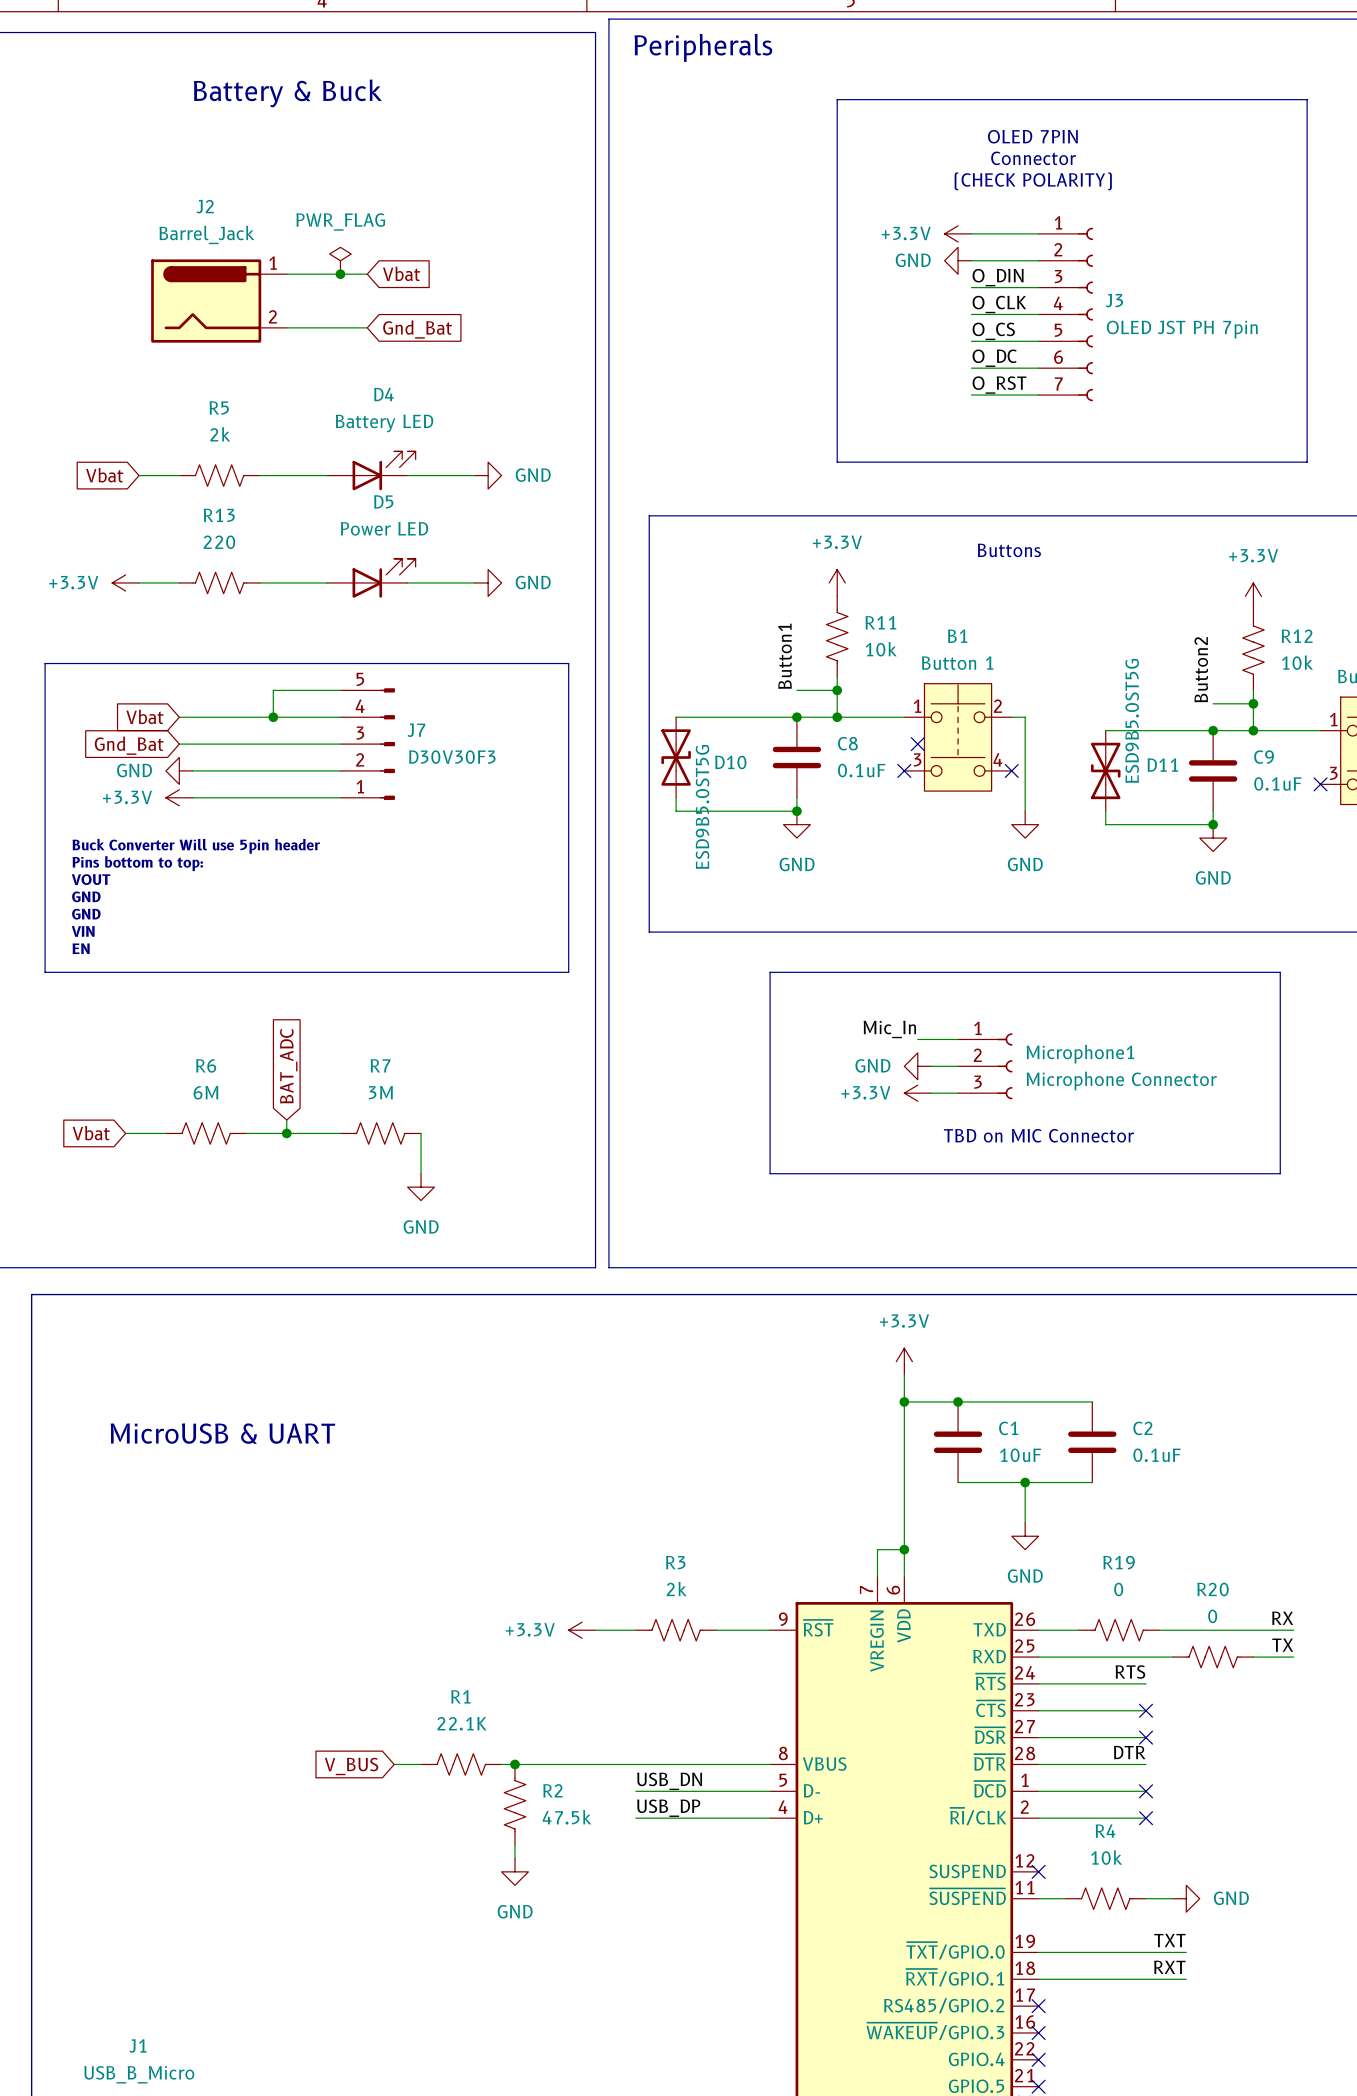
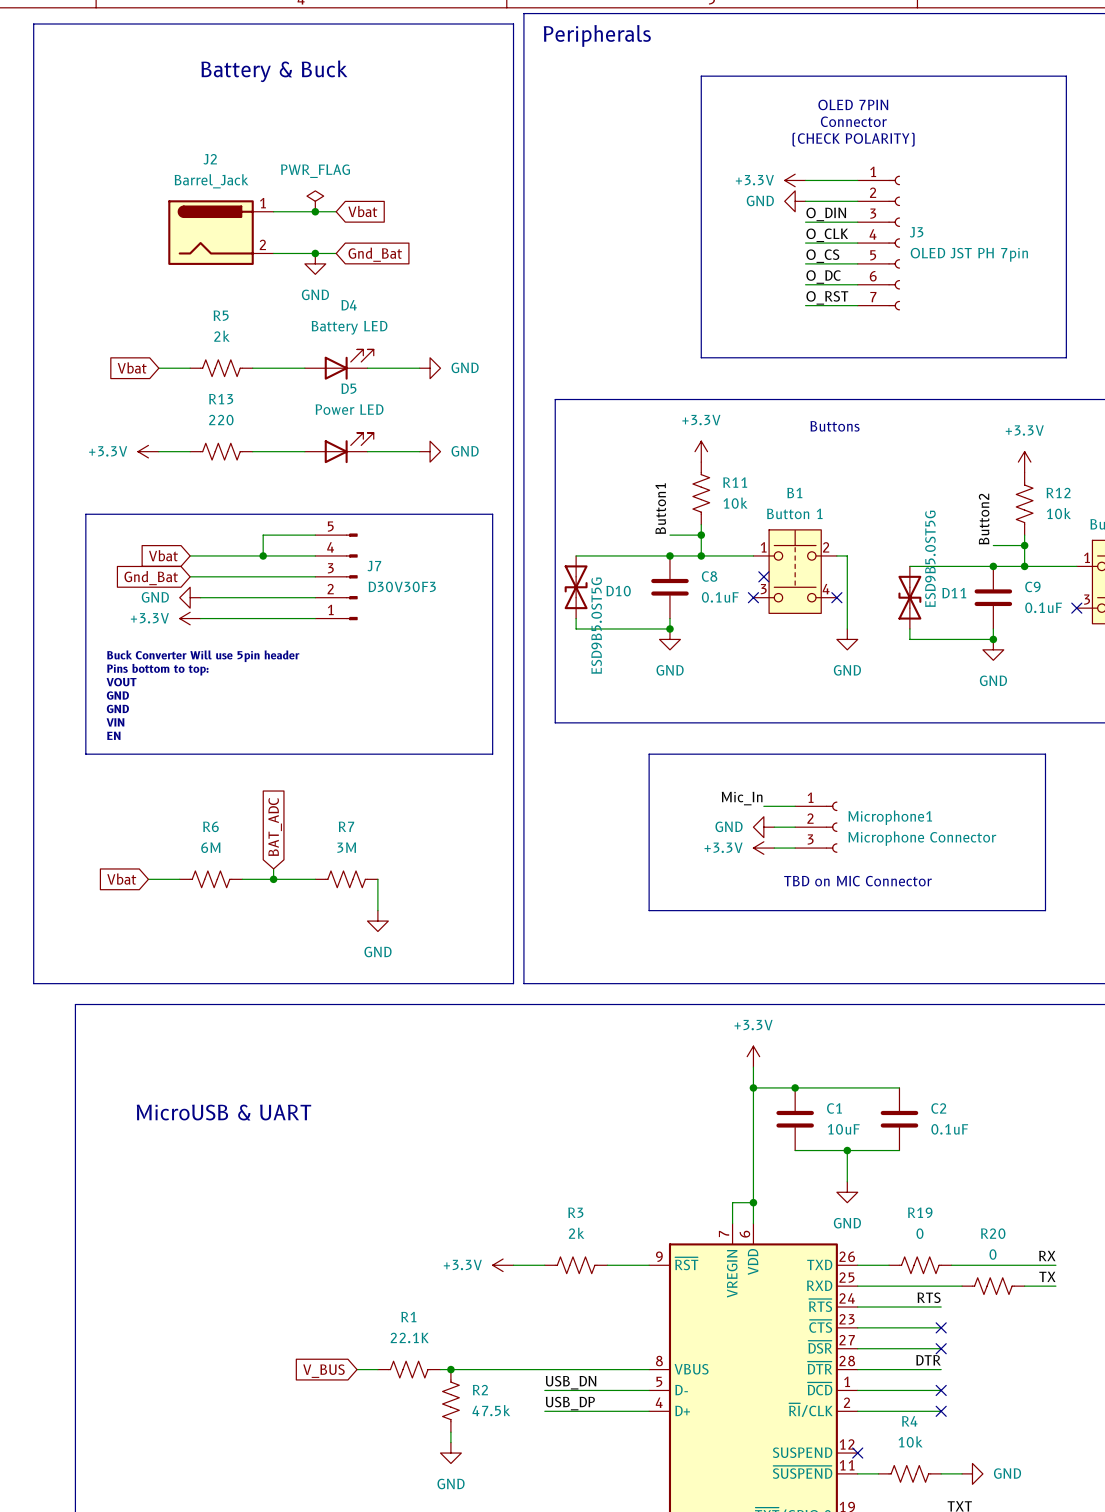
junction: none -> (315, 253)
power symbol: none -> GND (315, 263)

